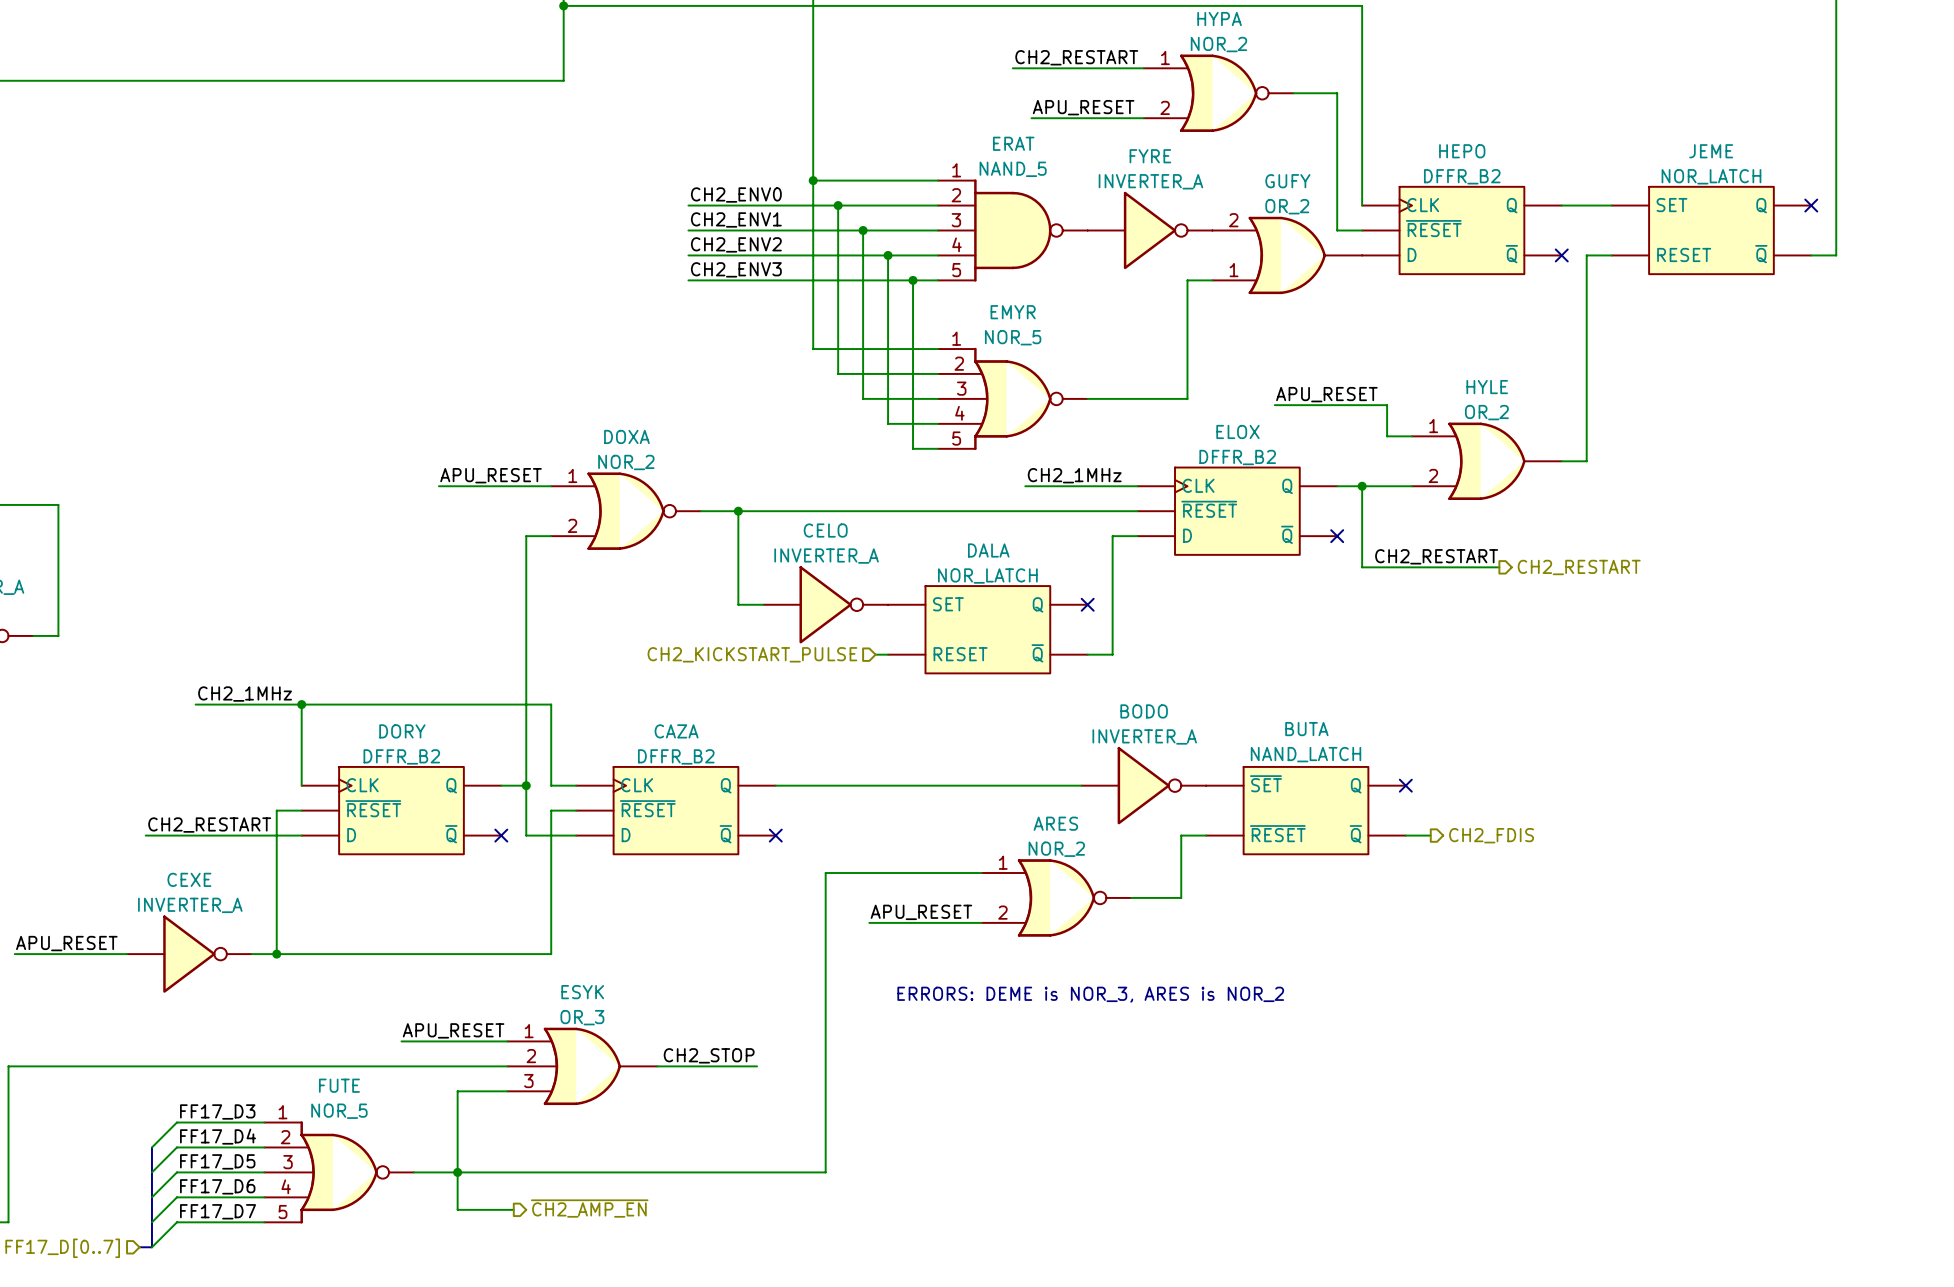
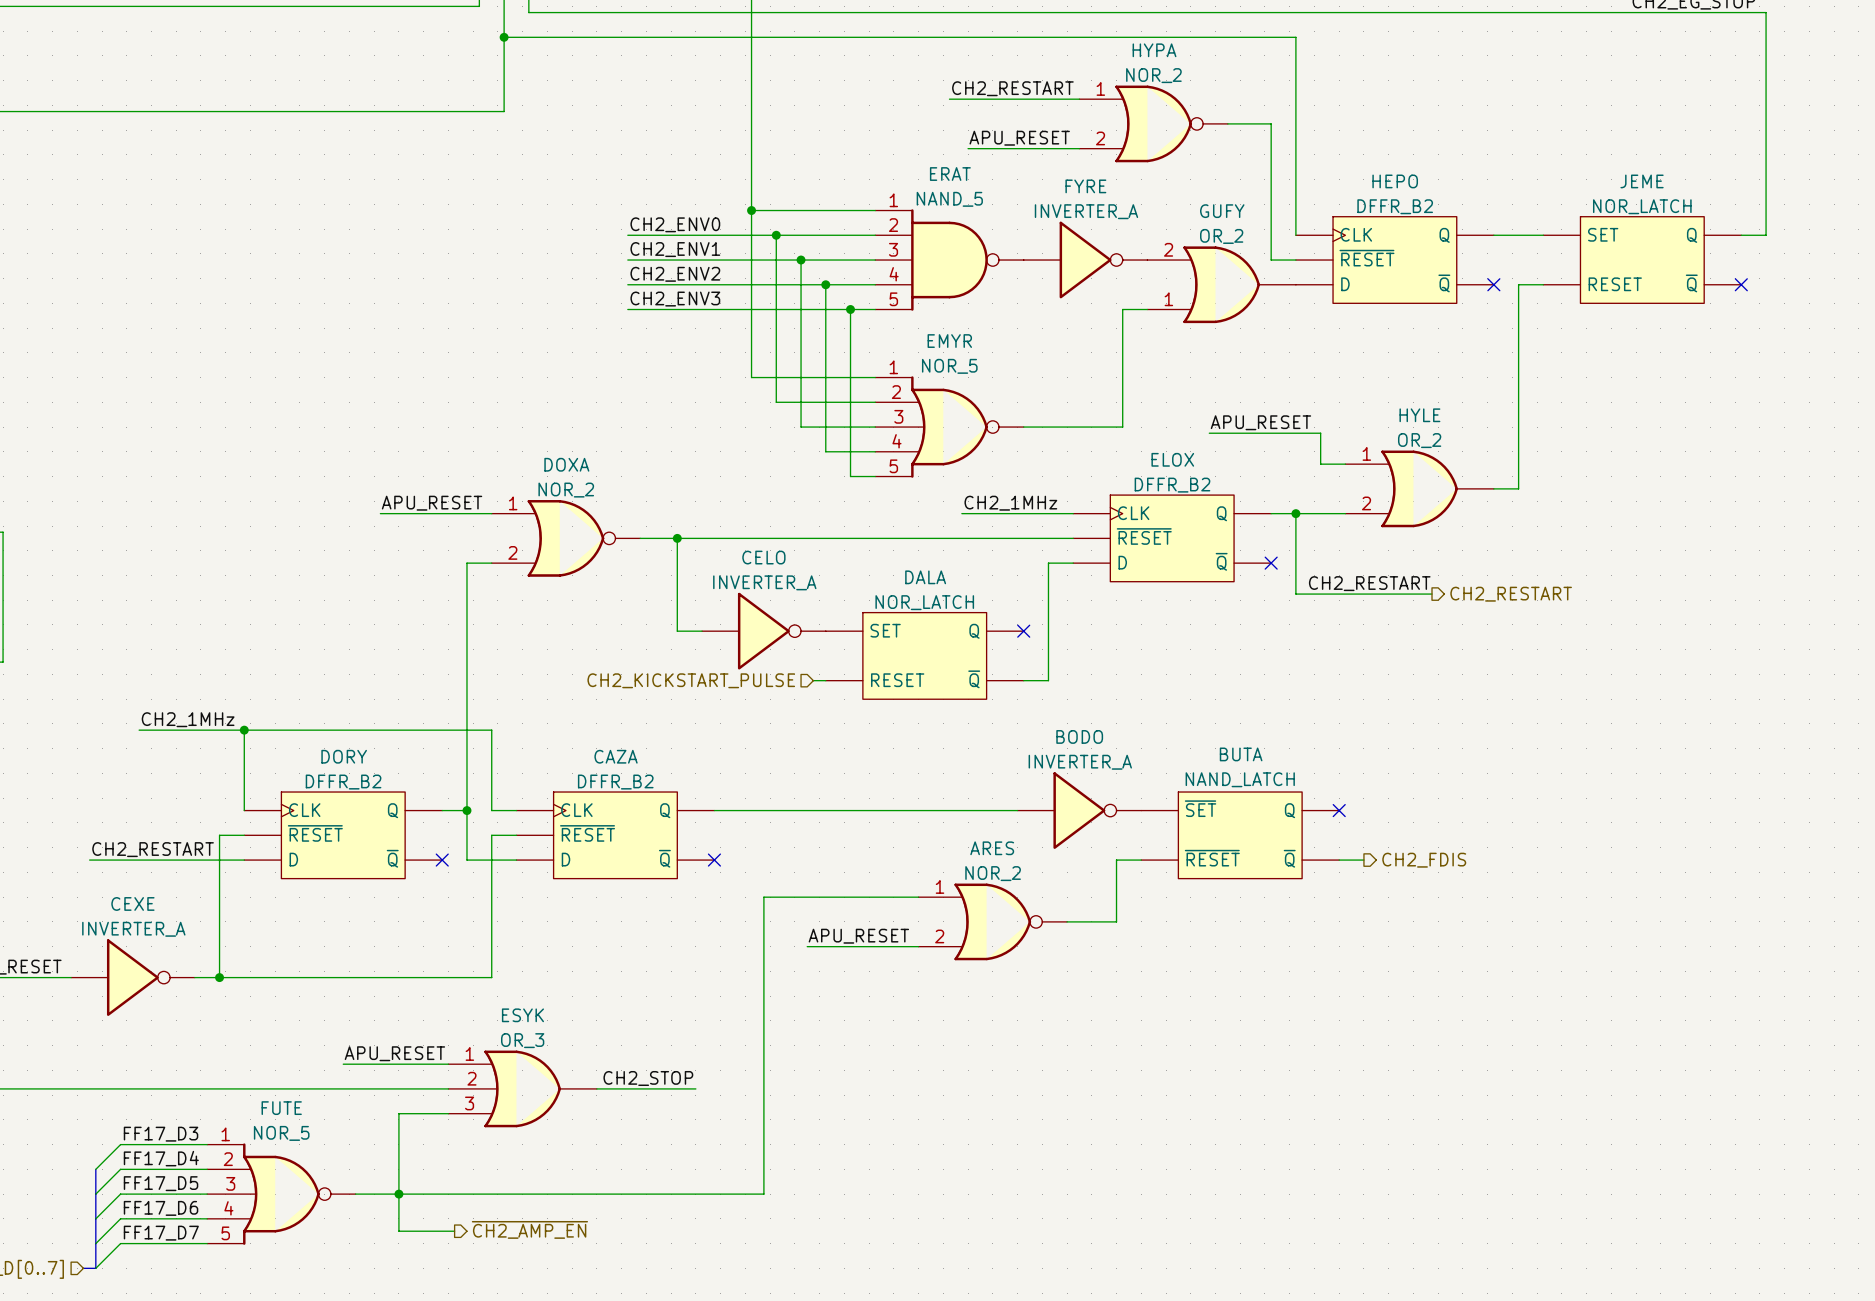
no-connect mark position: (1811, 205) -> (1741, 284)
wire: (1836, 205) (1836, 255) (1811, 255) -> (1766, 235) (1741, 235)
text: ERRORS: DEME is NOR_3, ARES is NOR_2 (1090, 994) -> none

